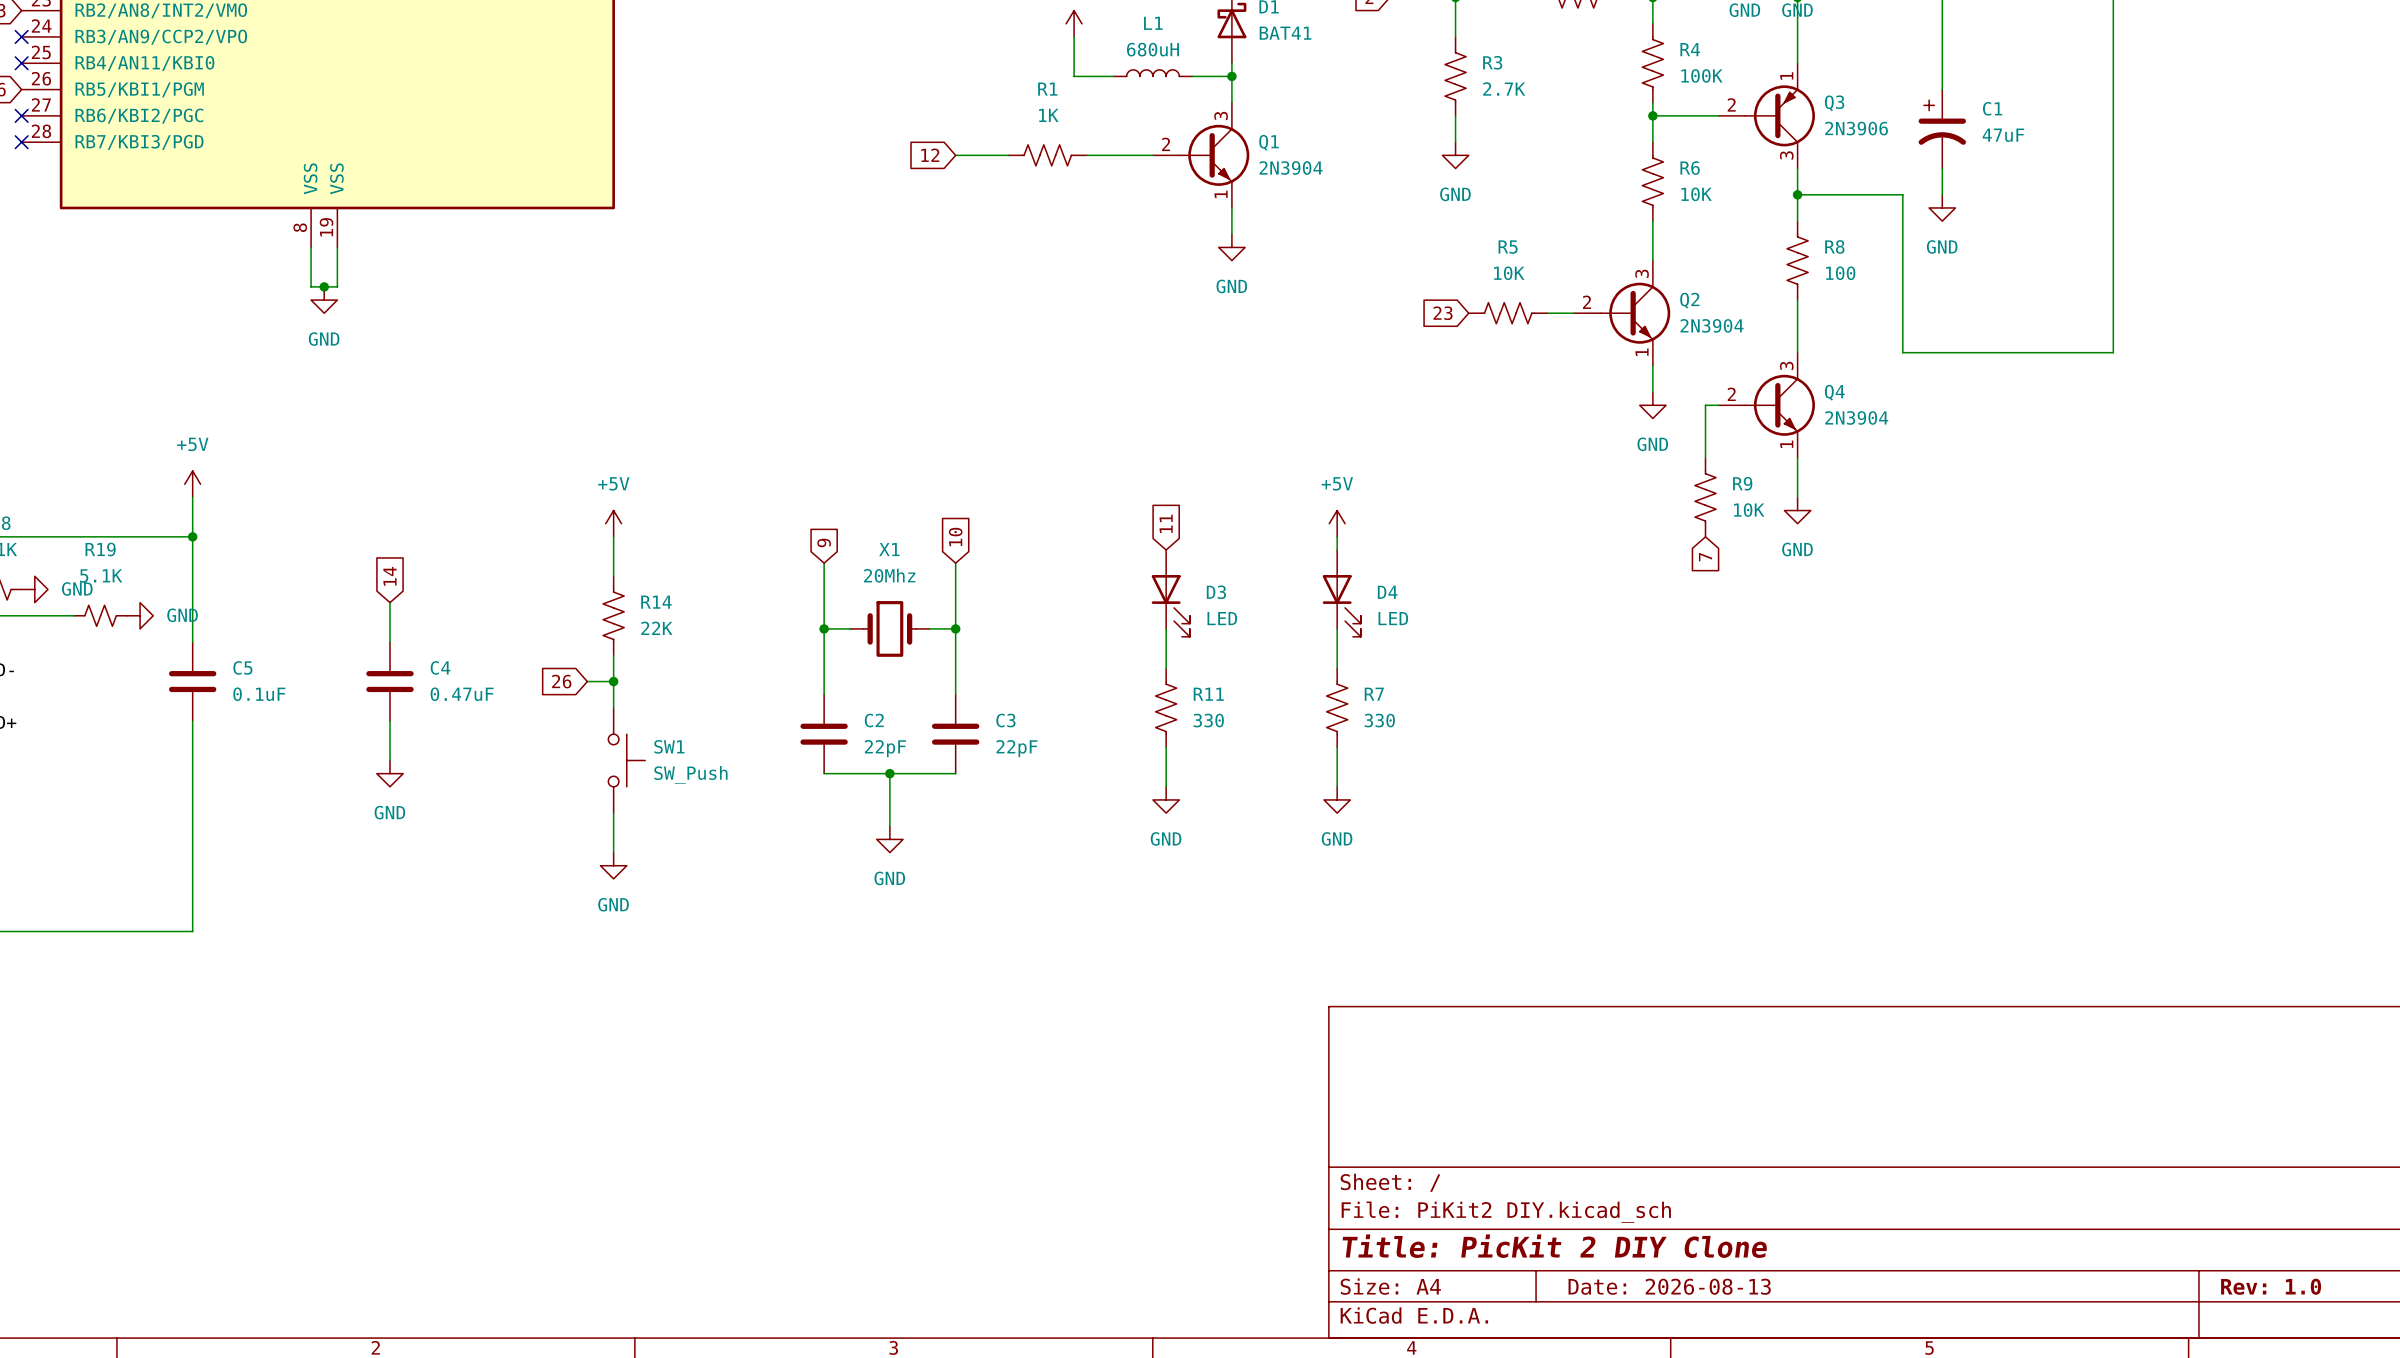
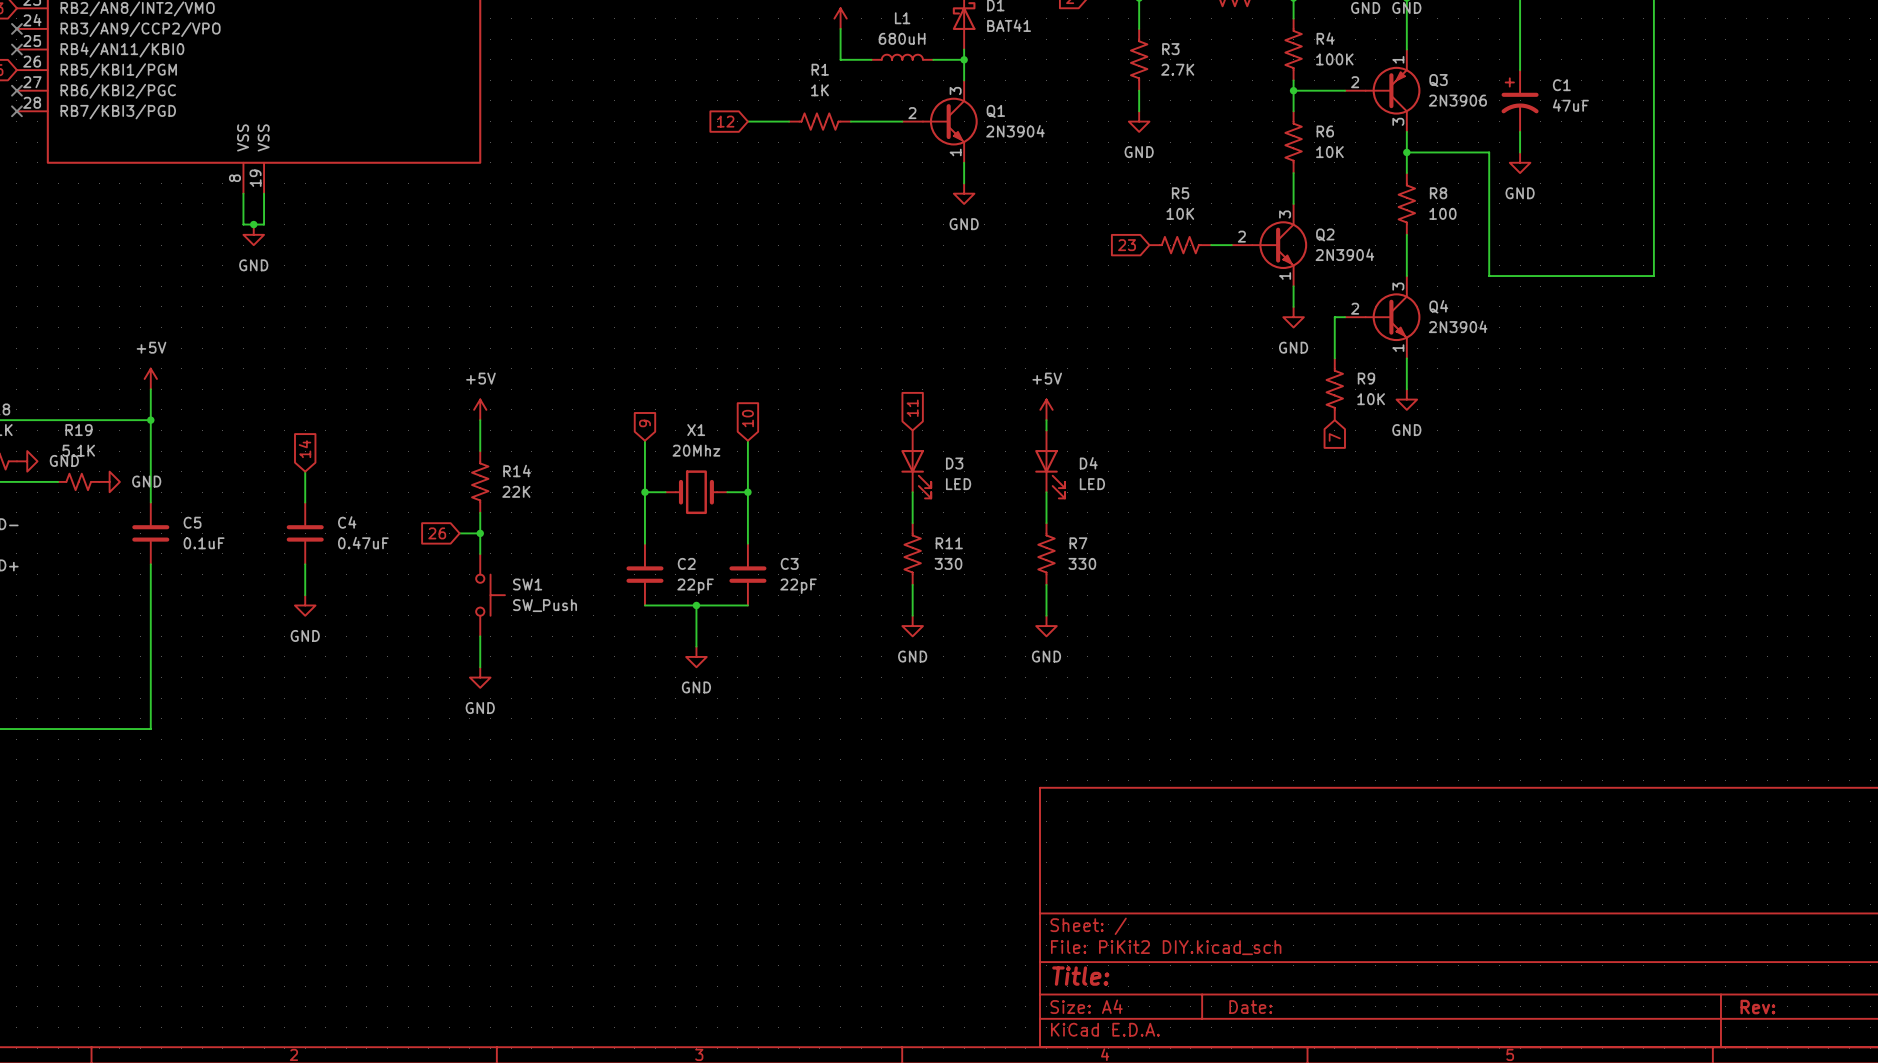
title block: Title: PicKit 2 DIY Clone (1554, 1246) -> Title: (1080, 976)
title block: Date: 2026-08-13 (1669, 1286) -> Date: (1250, 1007)
title block: Rev: 1.0 (2271, 1286) -> Rev: (1757, 1007)

